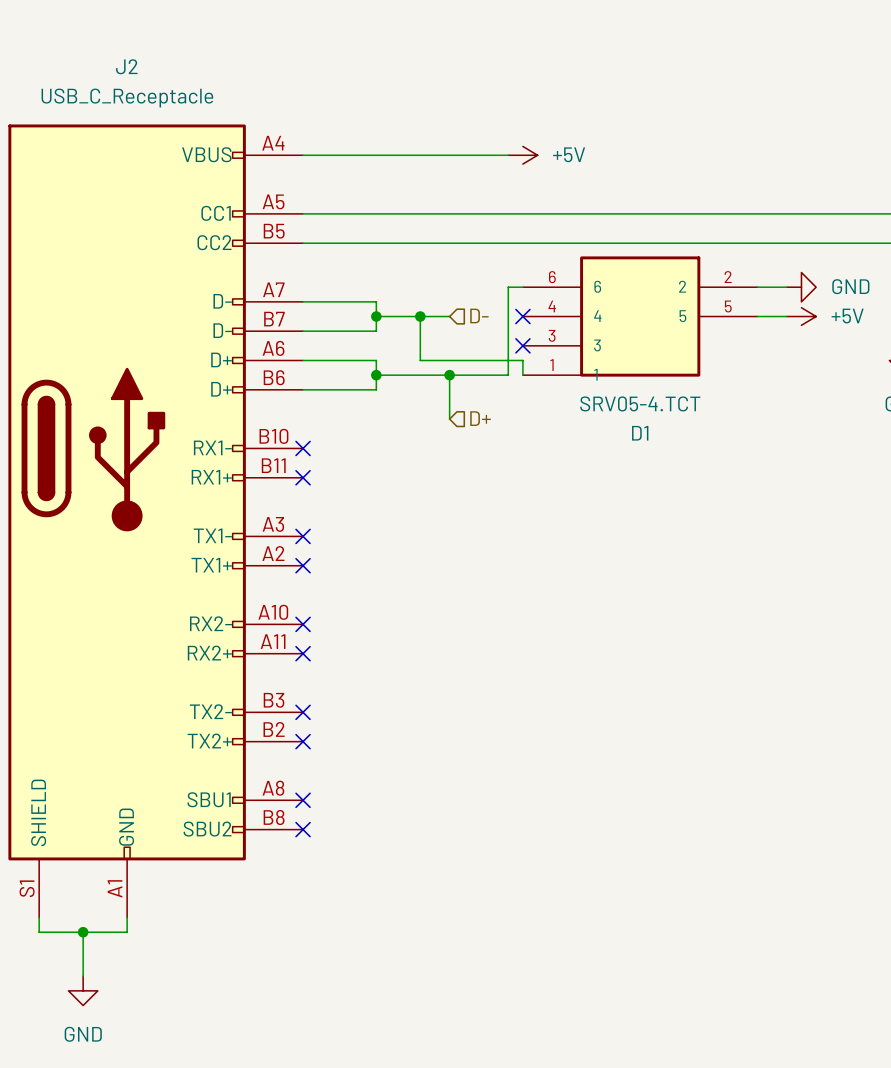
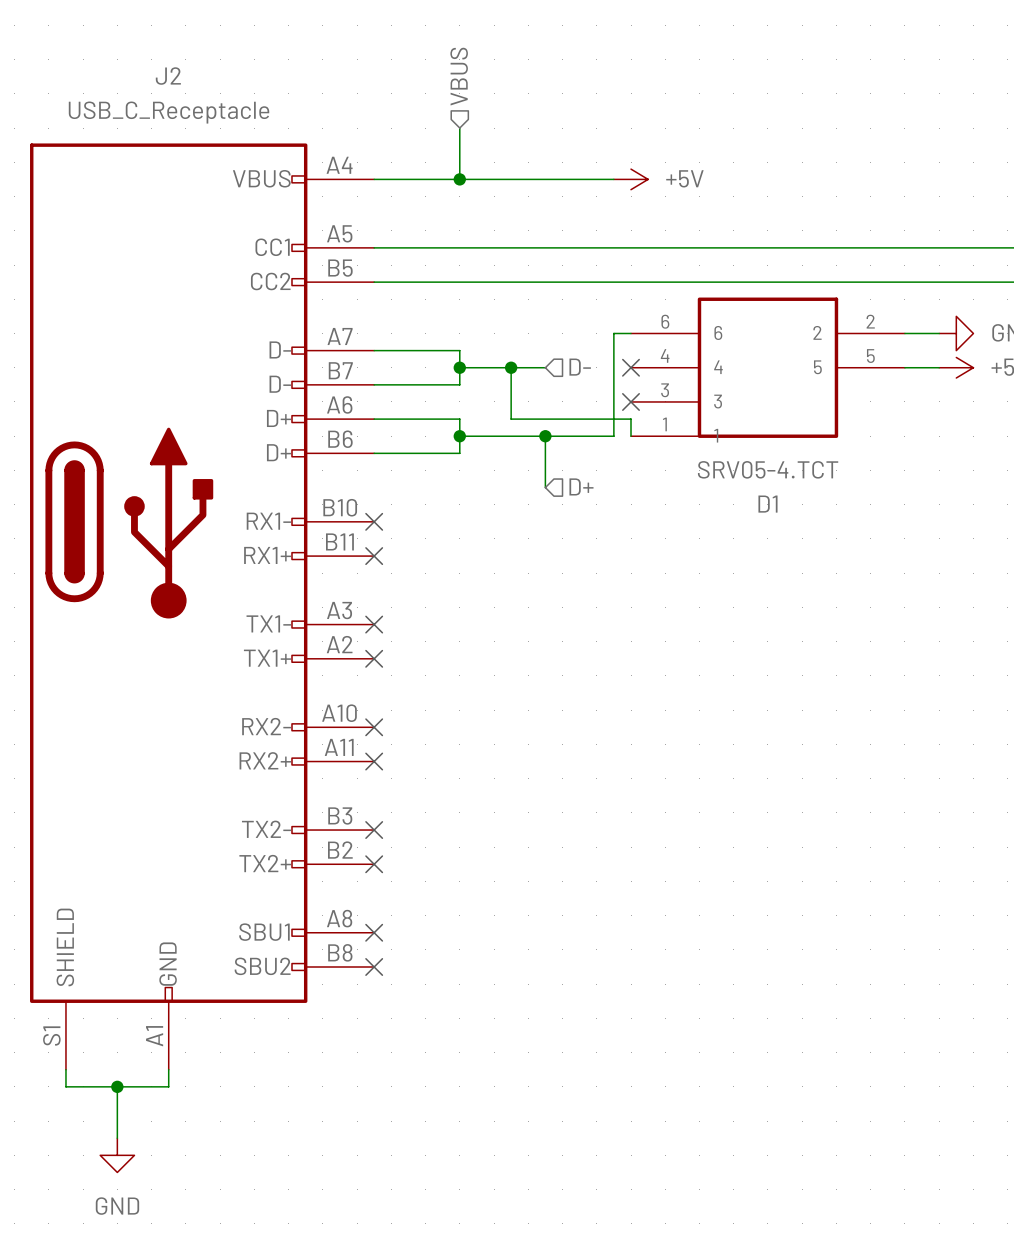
hierarchical label: none -> VBUS (459, 76)
wire: none -> (459, 128) (459, 179)
junction: none -> (459, 179)

